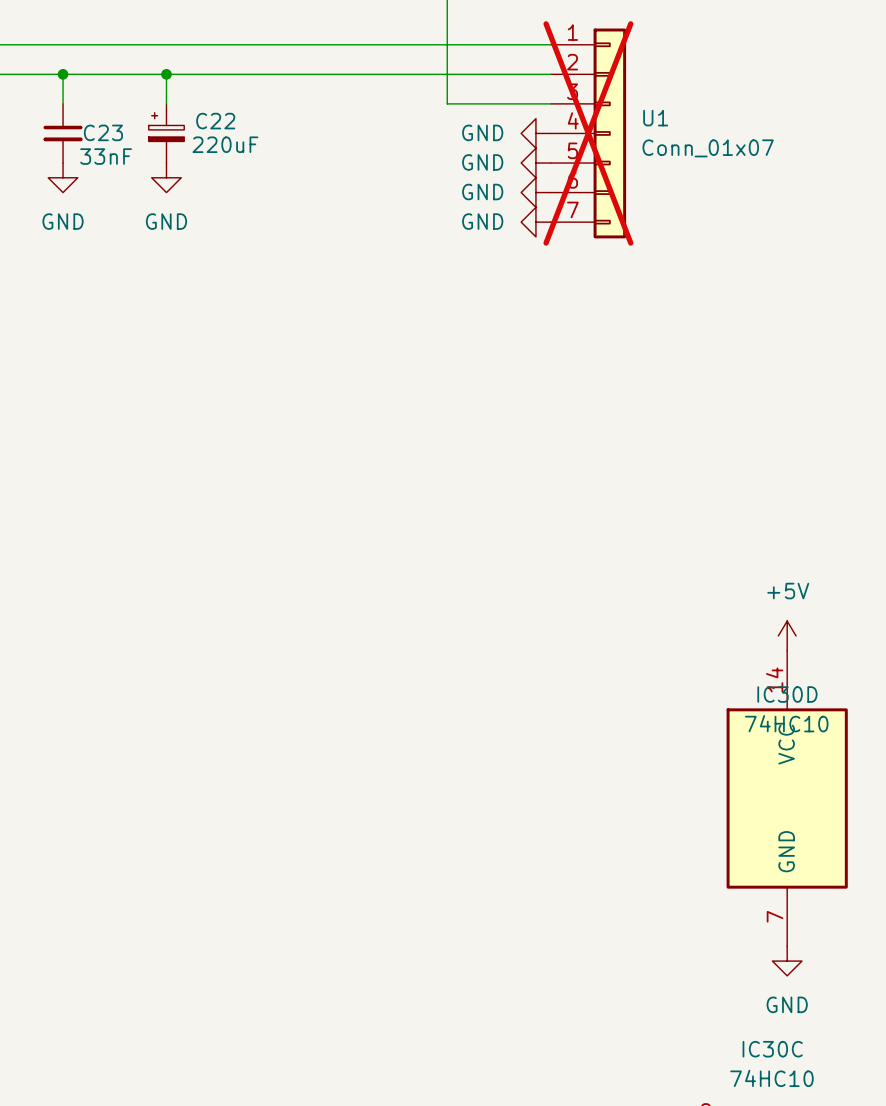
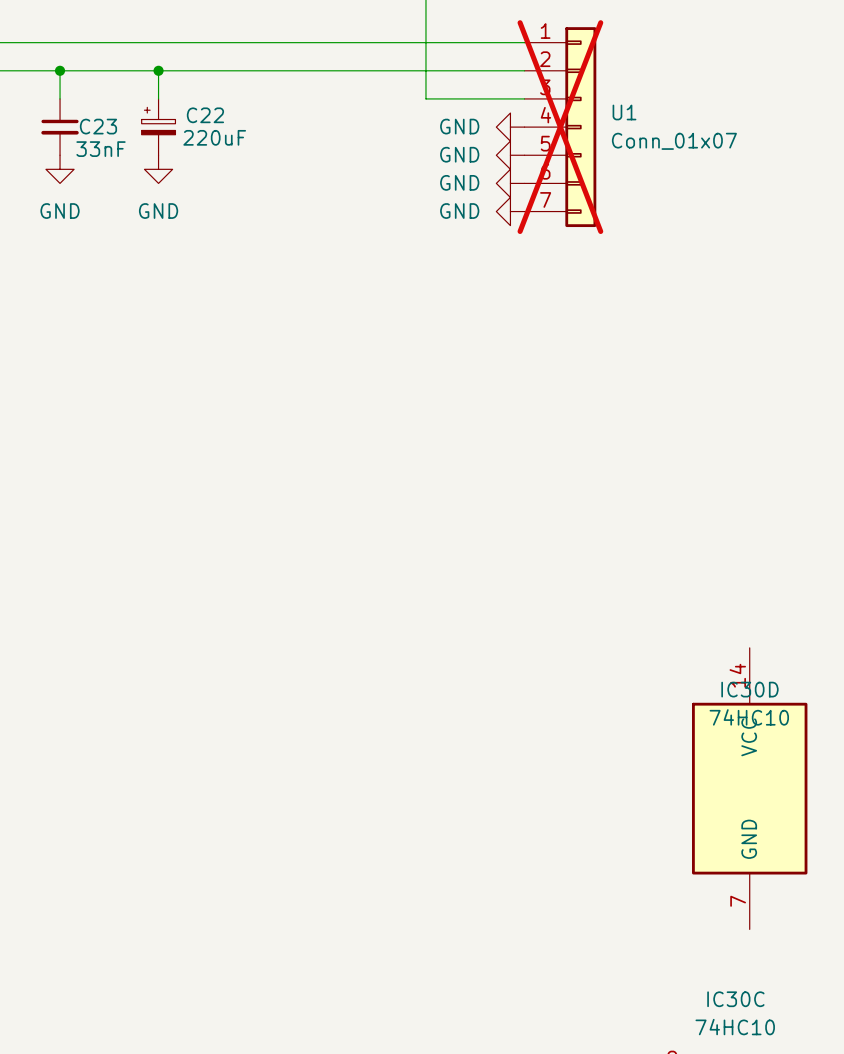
power symbol: +5V (787, 635) -> none
IC30D position: (787, 798) -> (749, 788)
power symbol: GND (787, 961) -> none

